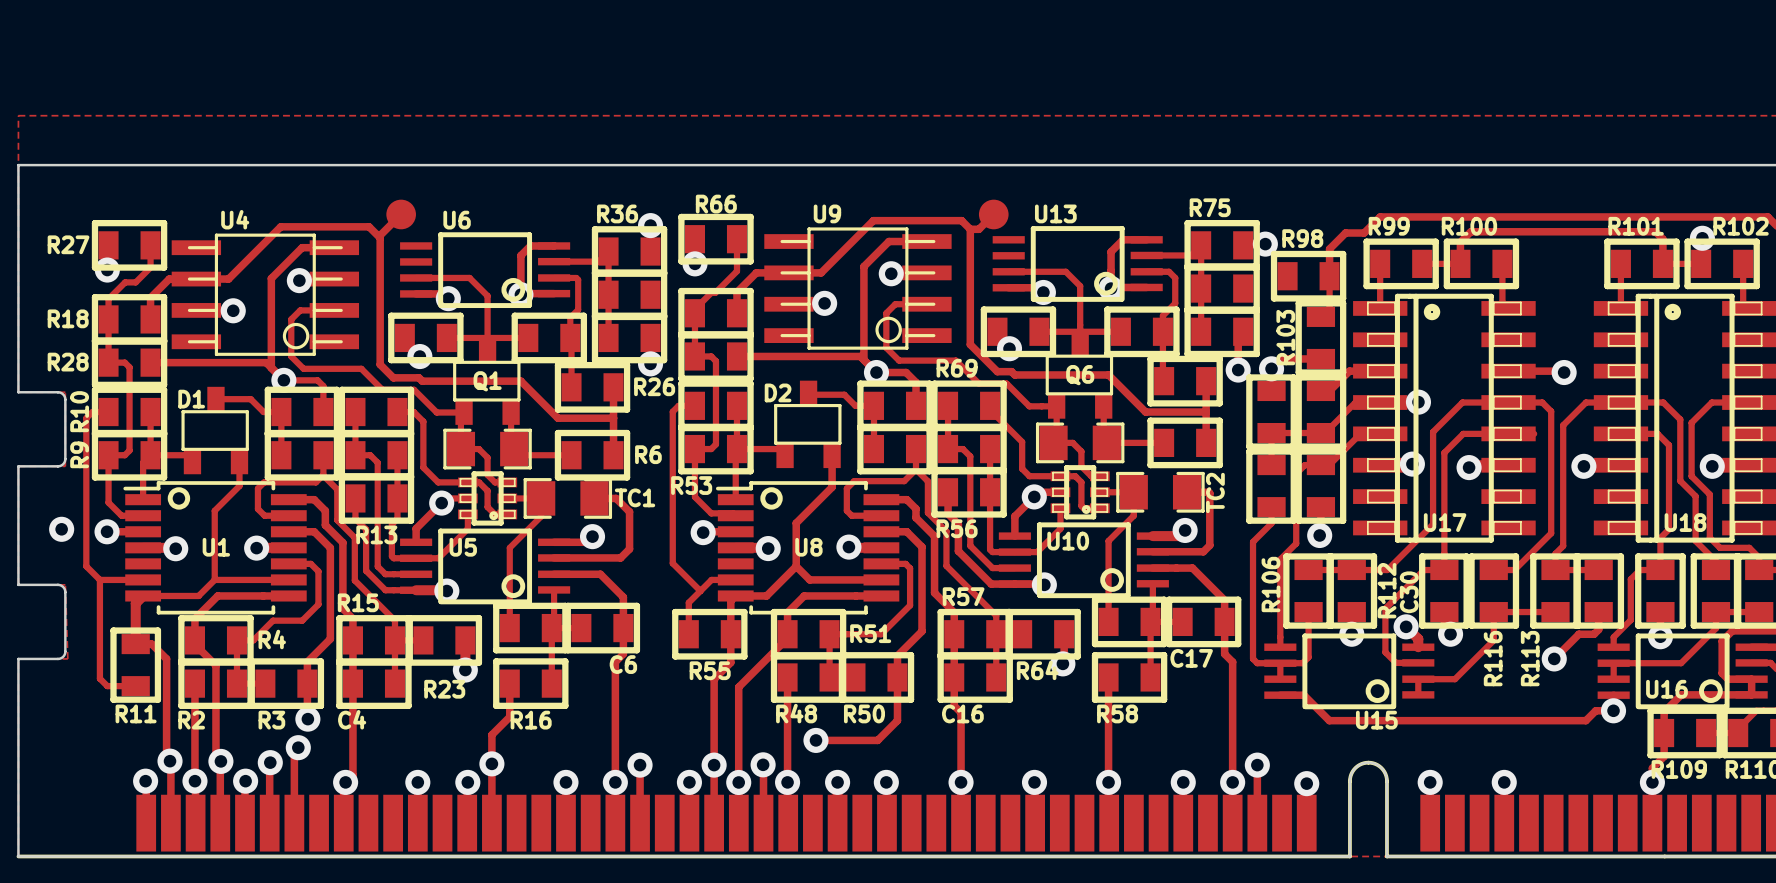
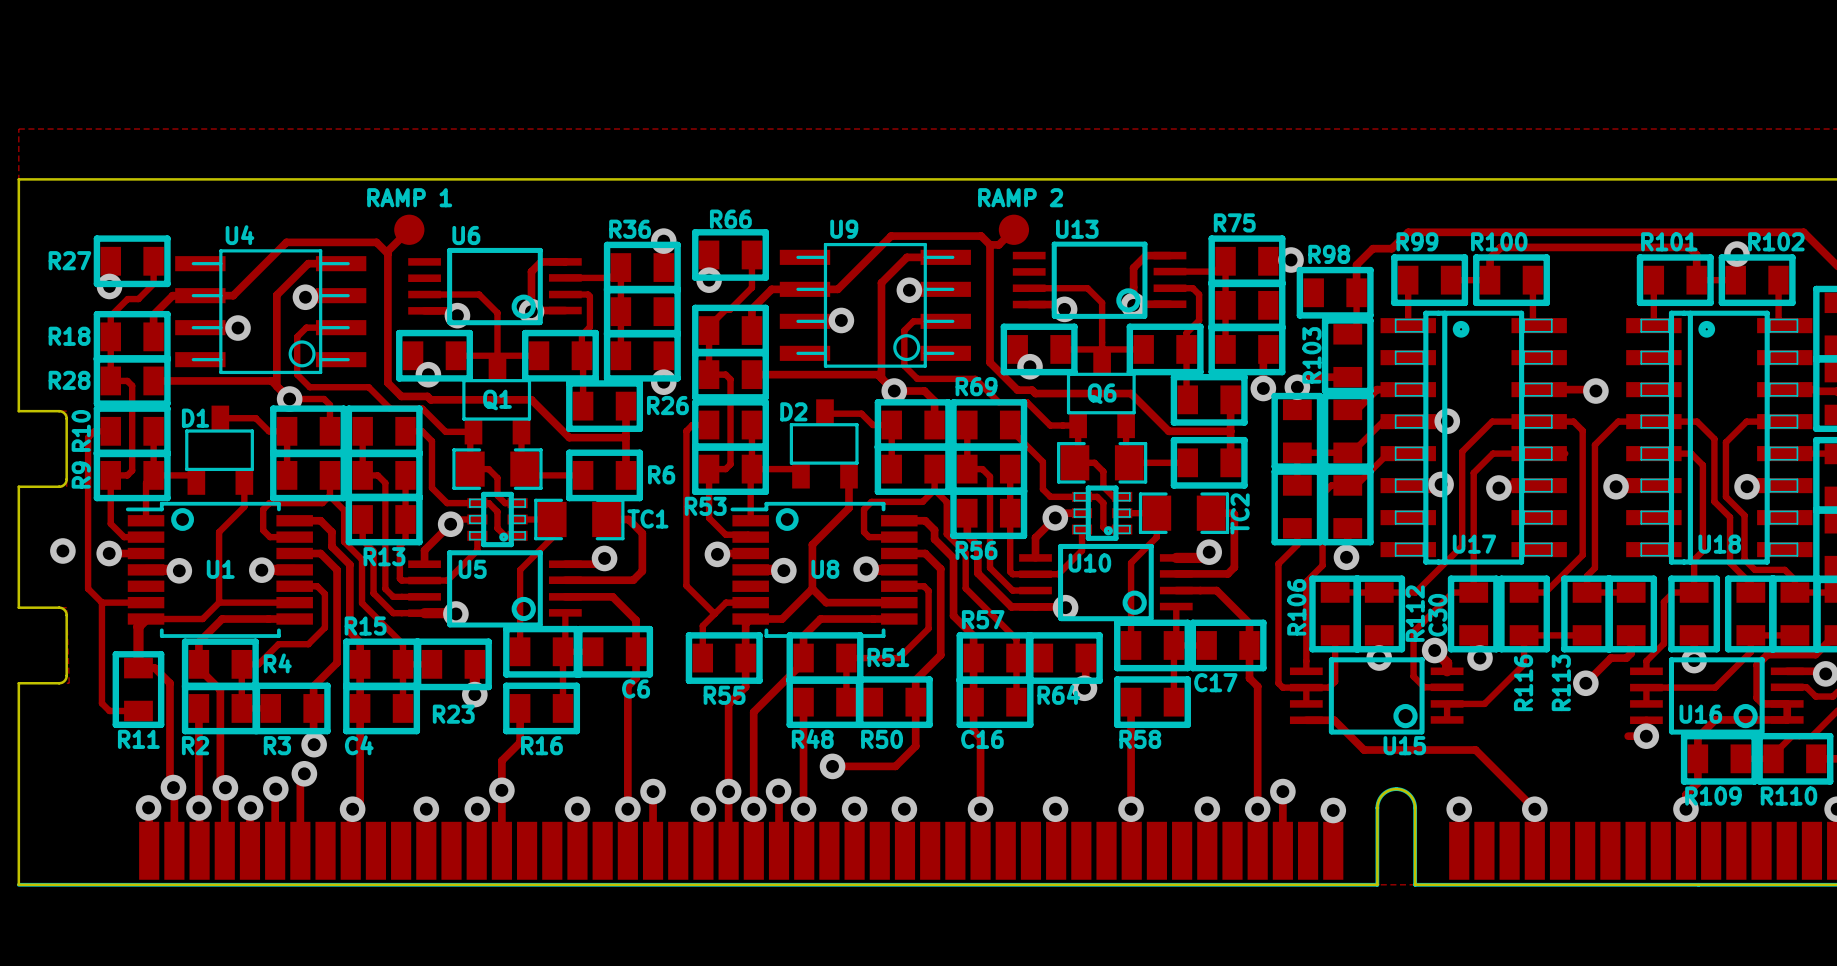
text: none -> RAMP 1 (409, 197)
text: none -> RAMP 2 (1020, 197)
track: (1303, 695) (1329, 720) (1585, 720) (1595, 710) -> (1330, 720) (1334, 720) (1364, 750) (1475, 750) (1534, 809)

